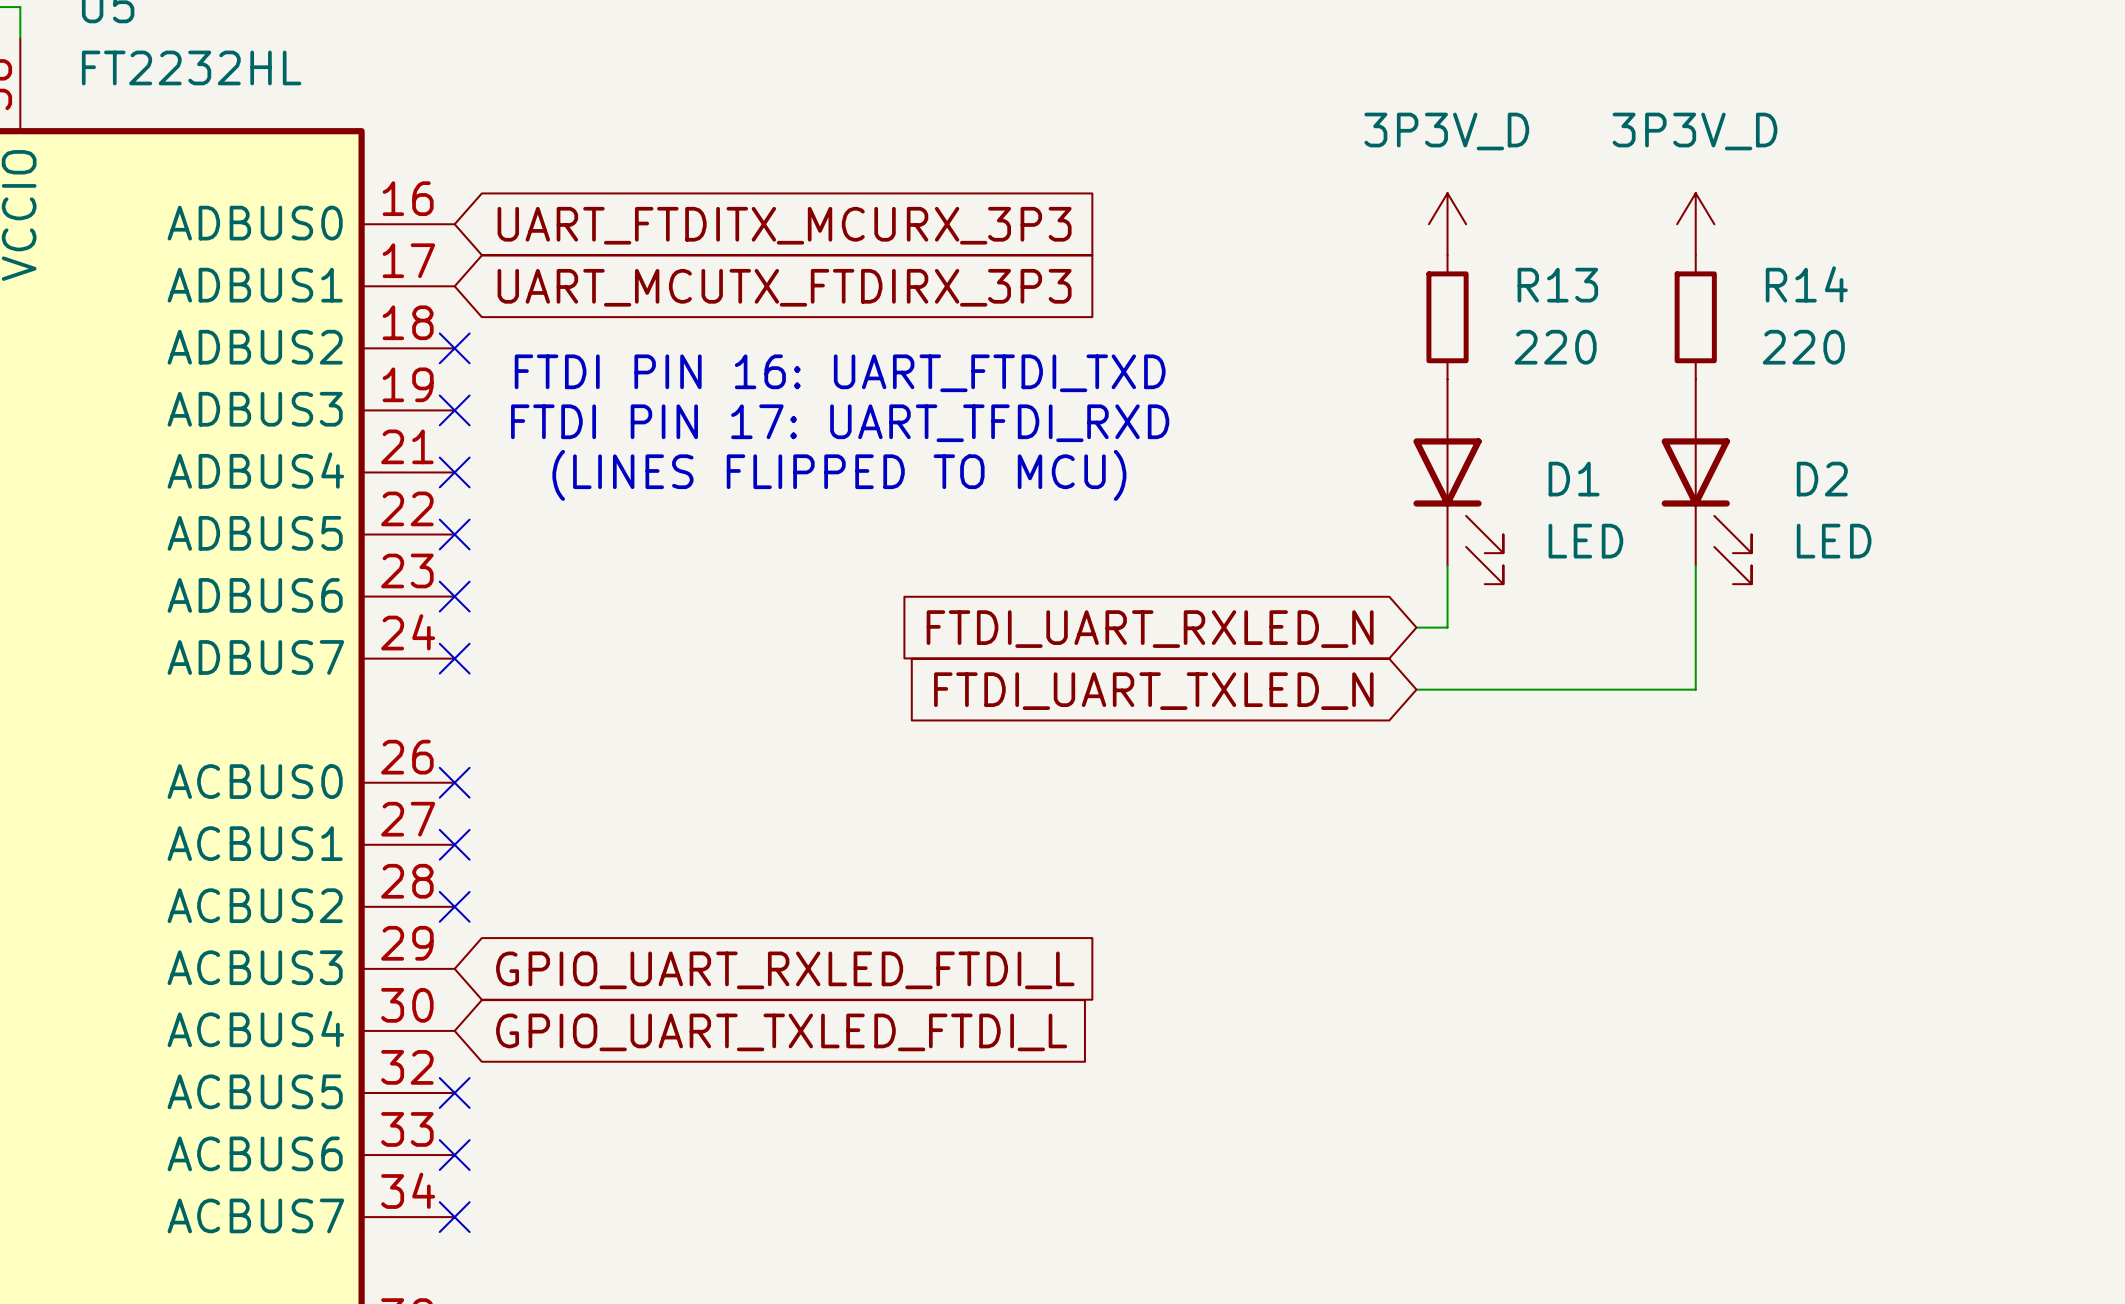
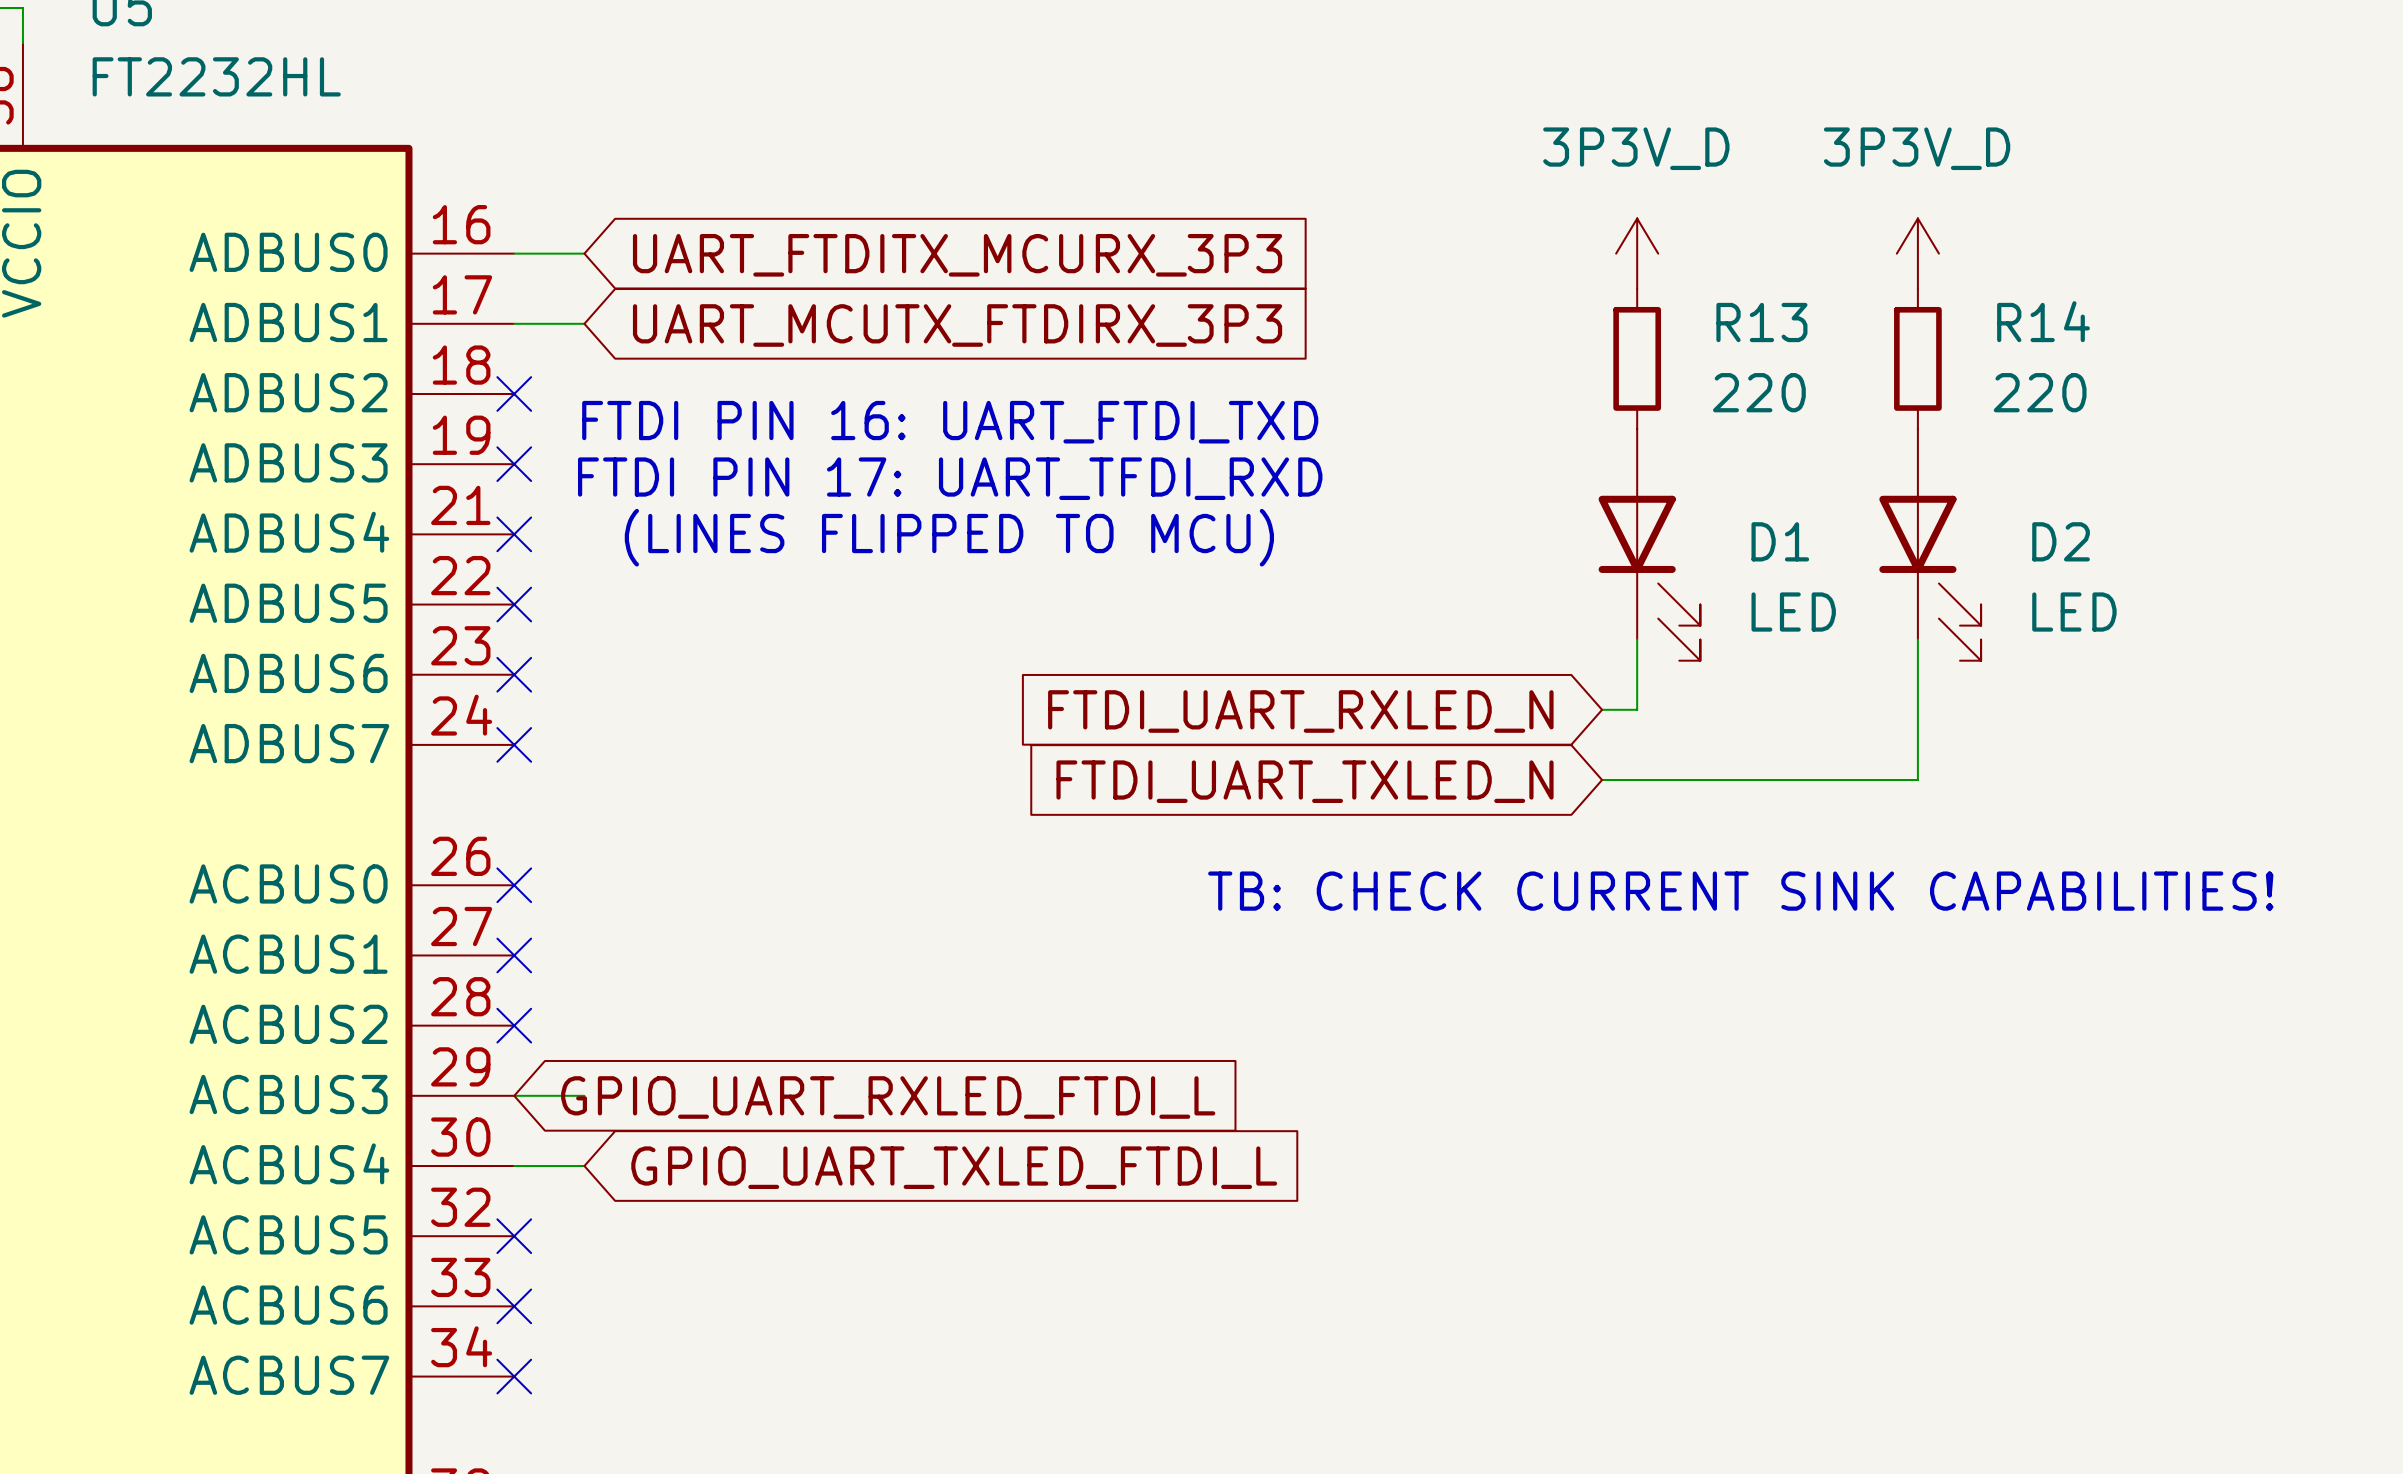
wire: none -> (514, 253) (584, 253)
global label position: UART_FTDITX_MCURX_3P3 (784, 225) -> UART_FTDITX_MCURX_3P3 (957, 255)
wire: none -> (514, 323) (584, 323)
global label position: UART_MCUTX_FTDIRX_3P3 (784, 287) -> UART_MCUTX_FTDIRX_3P3 (957, 325)
text: none -> TB: CHECK CURRENT SINK CAPABILITIES! (1740, 891)
wire: none -> (514, 1095) (584, 1095)
wire: none -> (514, 1166) (584, 1166)
global label position: GPIO_UART_TXLED_FTDI_L (781, 1032) -> GPIO_UART_TXLED_FTDI_L (954, 1167)

